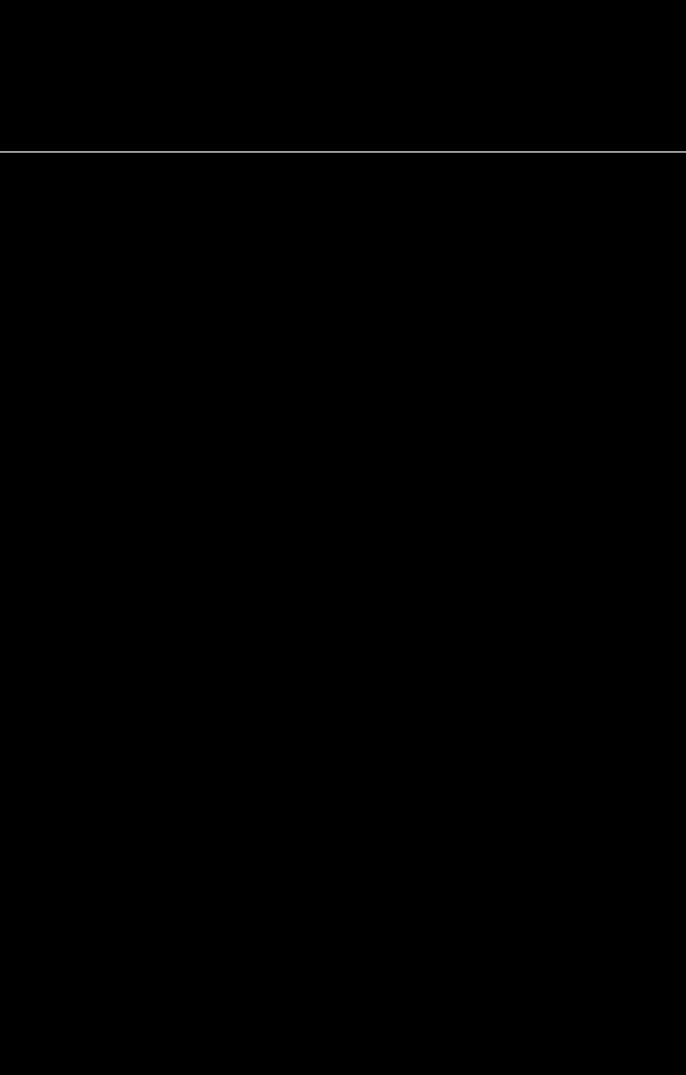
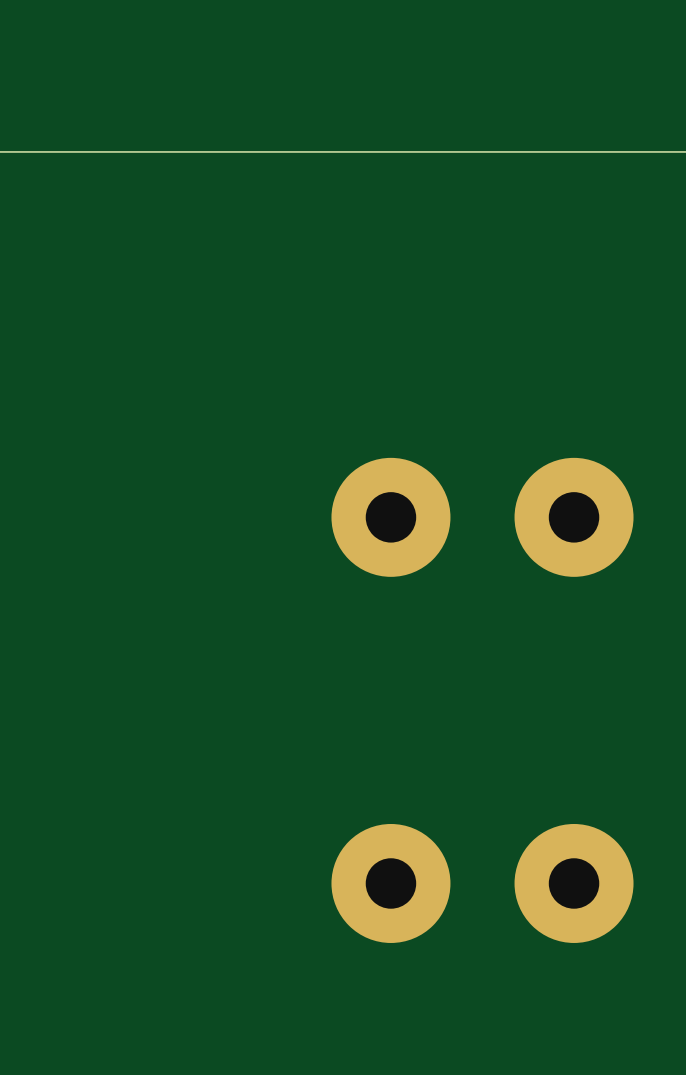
part: none -> (482, 517)
part: none -> (482, 883)

